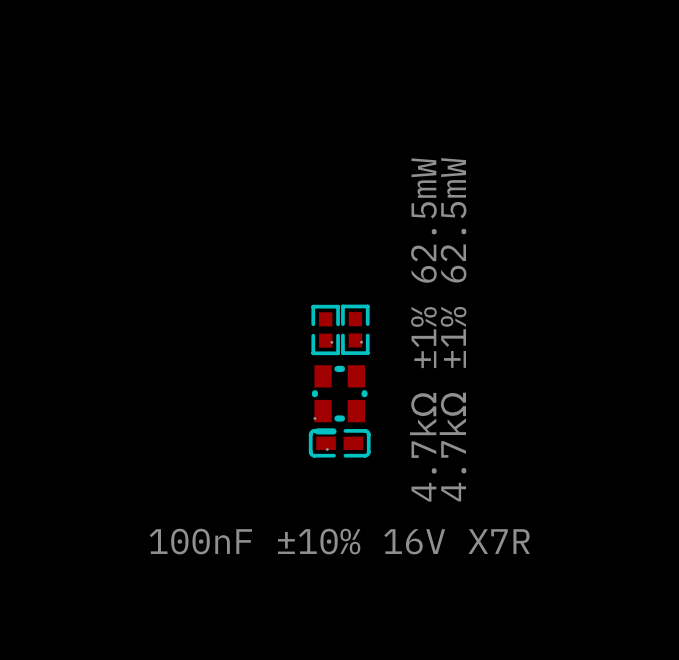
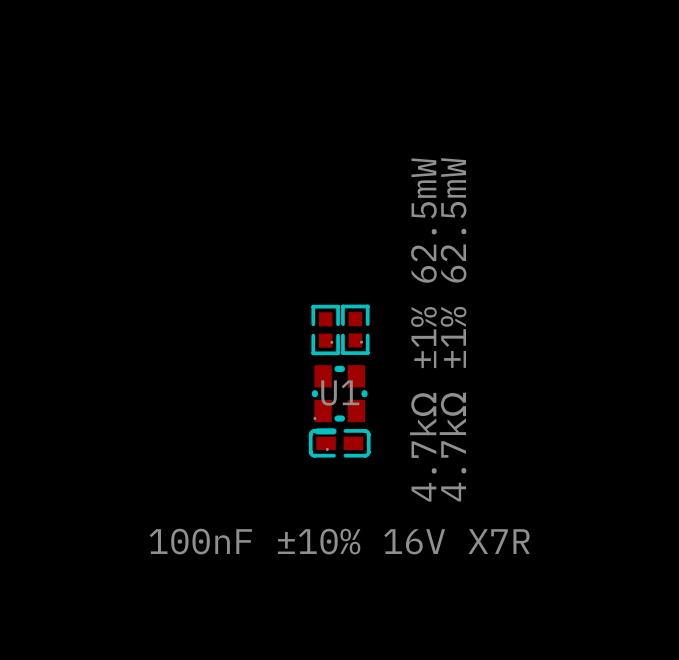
U1 name: none -> U1 (340, 392)

